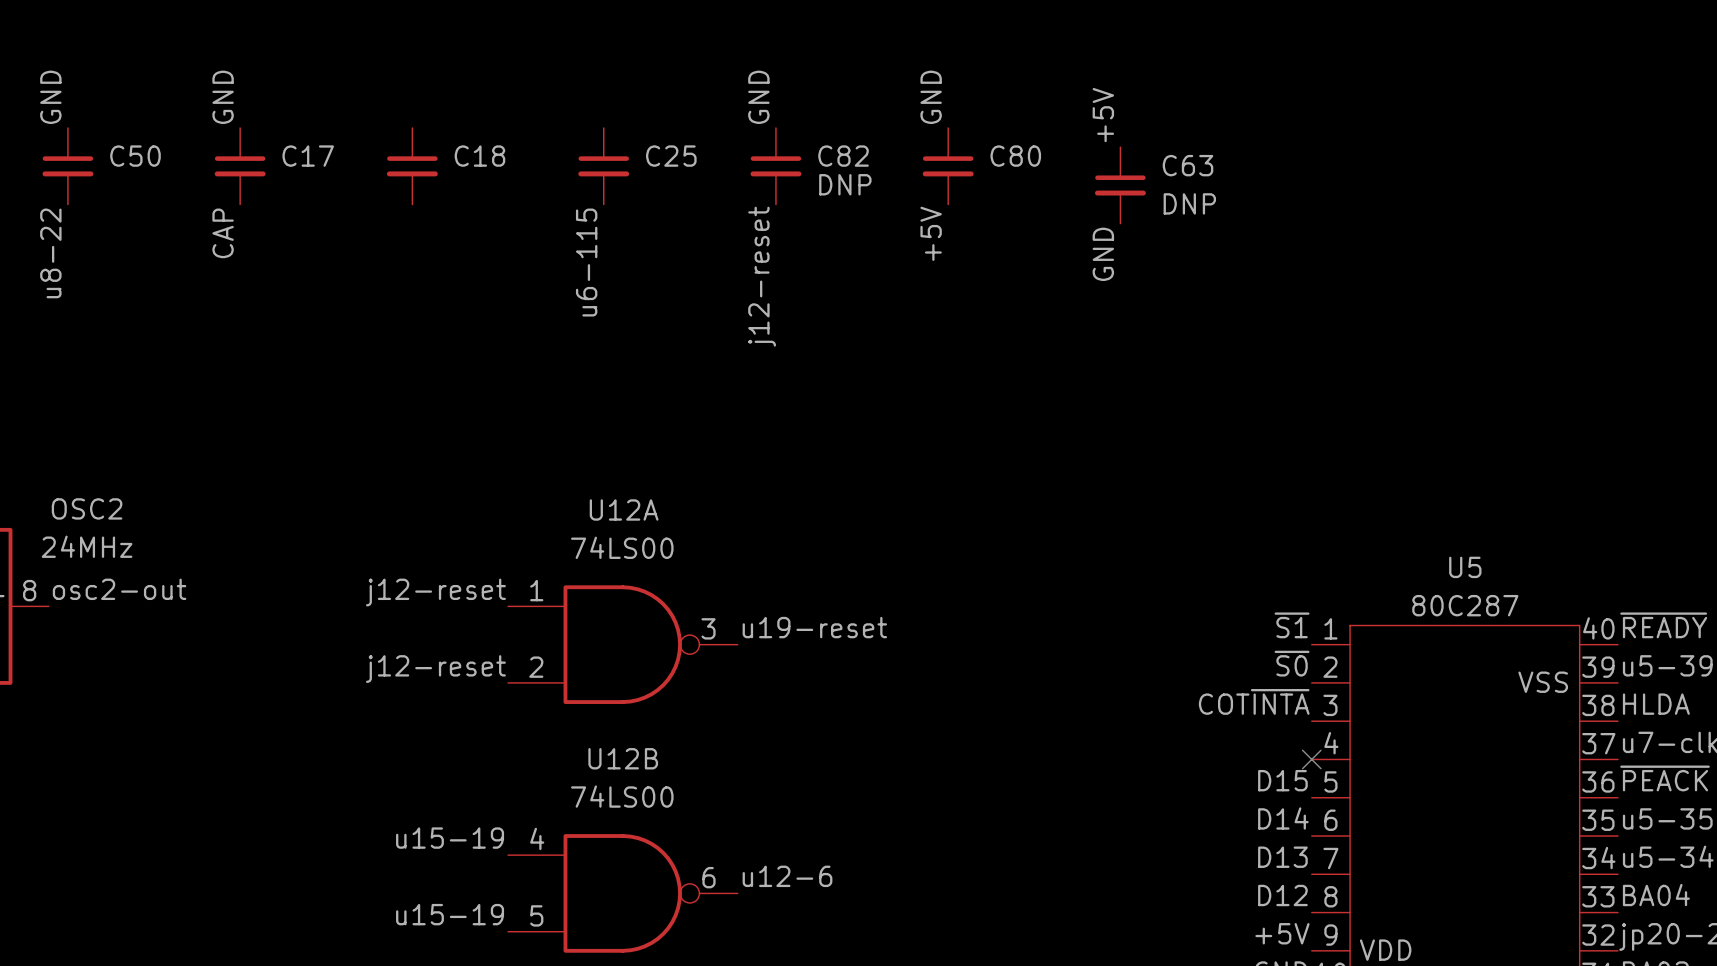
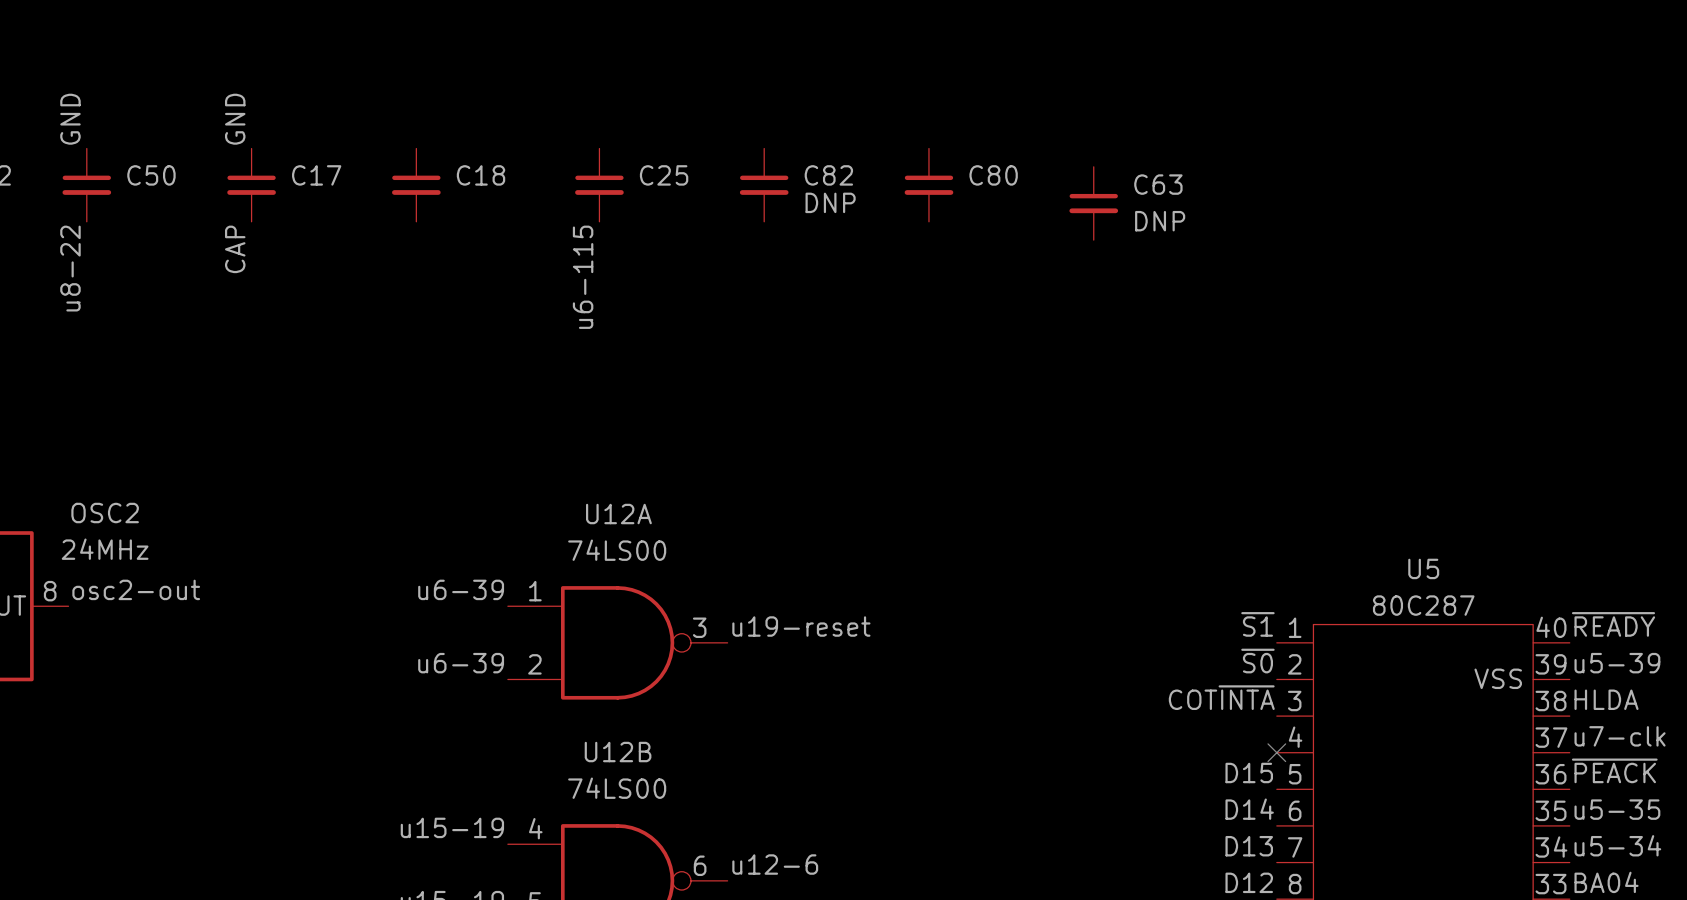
label: GND (758, 97) -> none
label: GND (931, 97) -> none
label: +5V (1103, 115) -> none
label: +5V (931, 233) -> none
label: GND (1103, 254) -> none
label: j12-reset (762, 276) -> none
label: j12-reset (435, 592) -> u6-39 (461, 589)
label: j12-reset (435, 669) -> u6-39 (461, 663)

